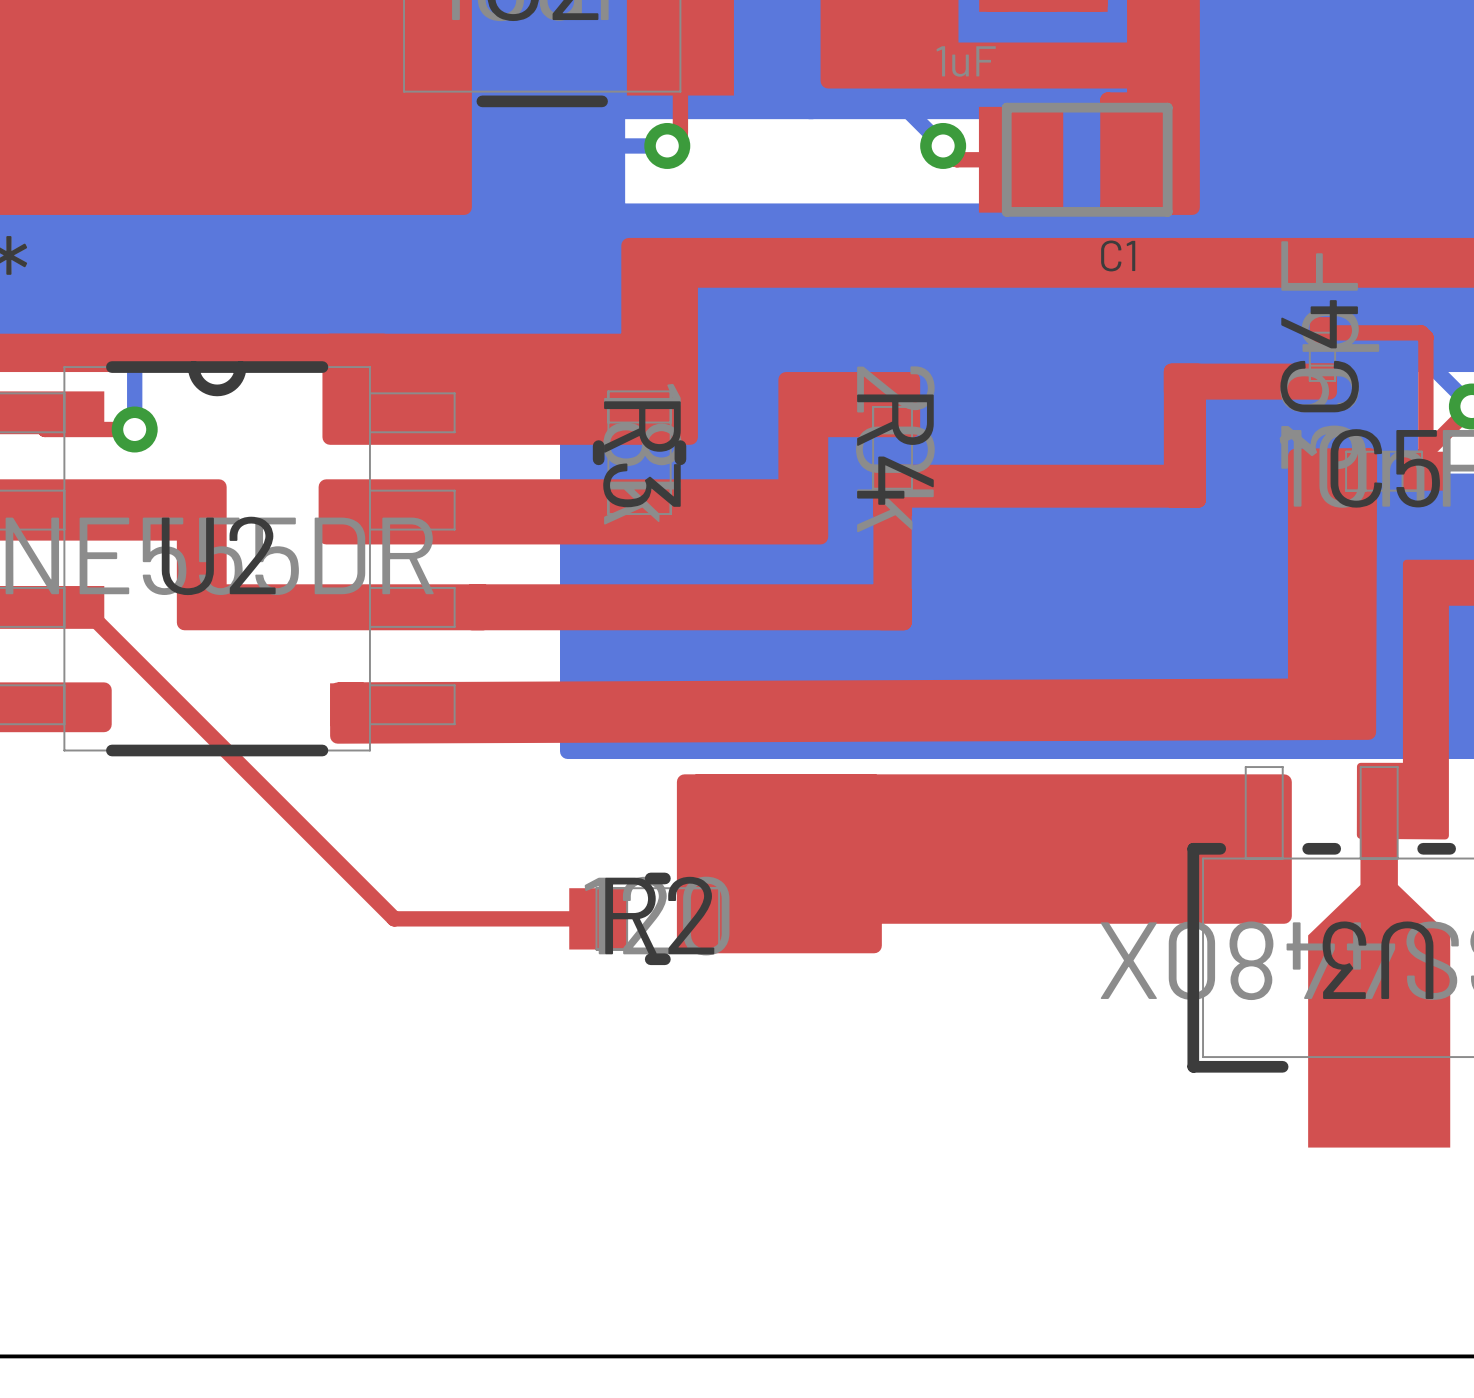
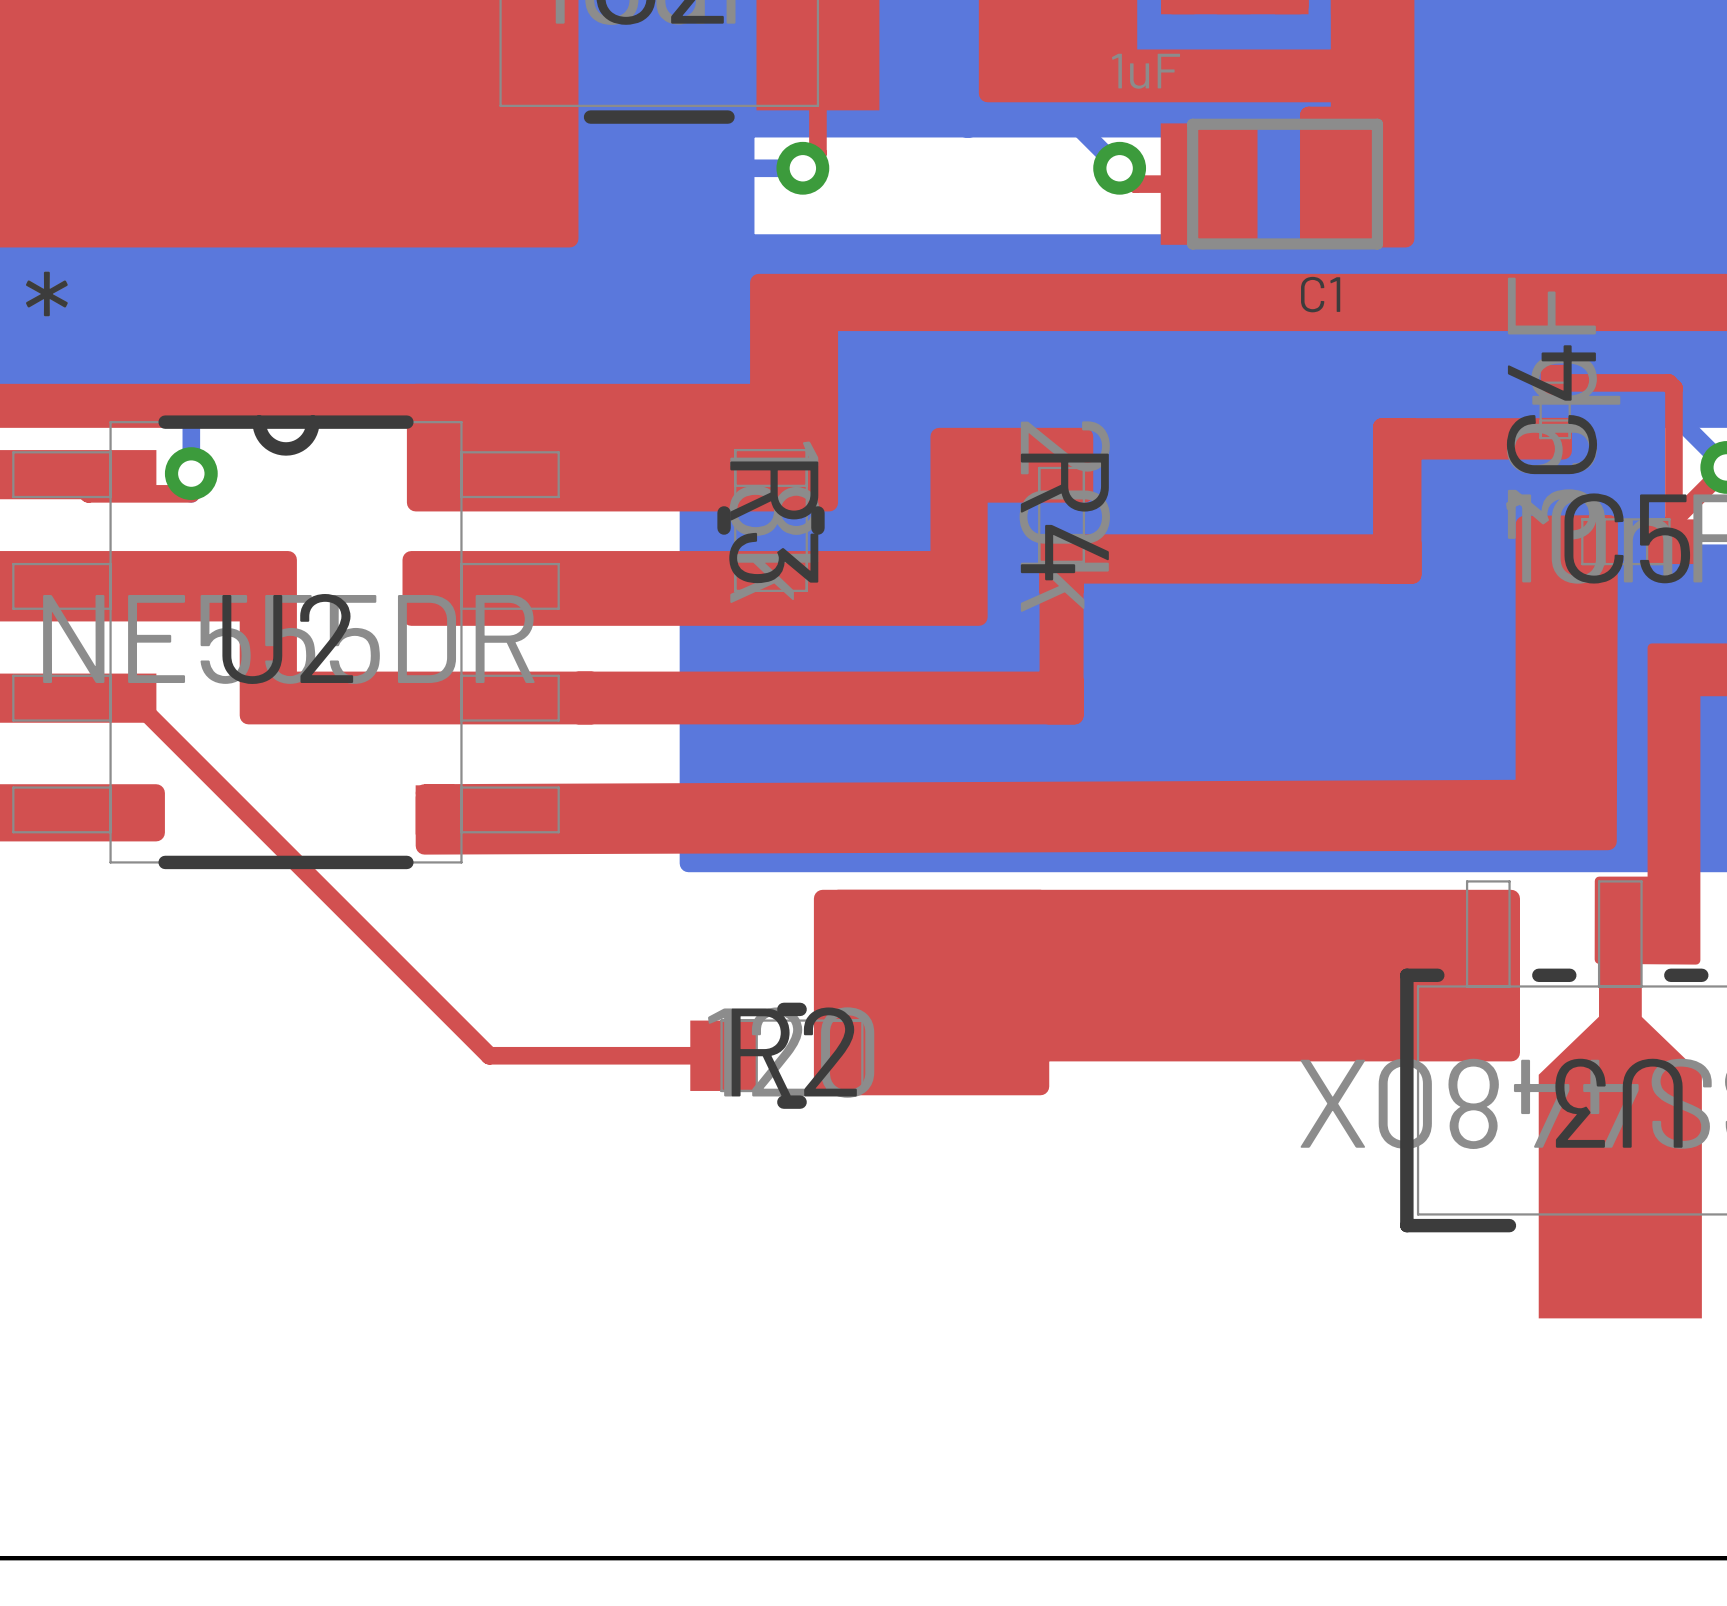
via position: (134, 429) -> (191, 473)

